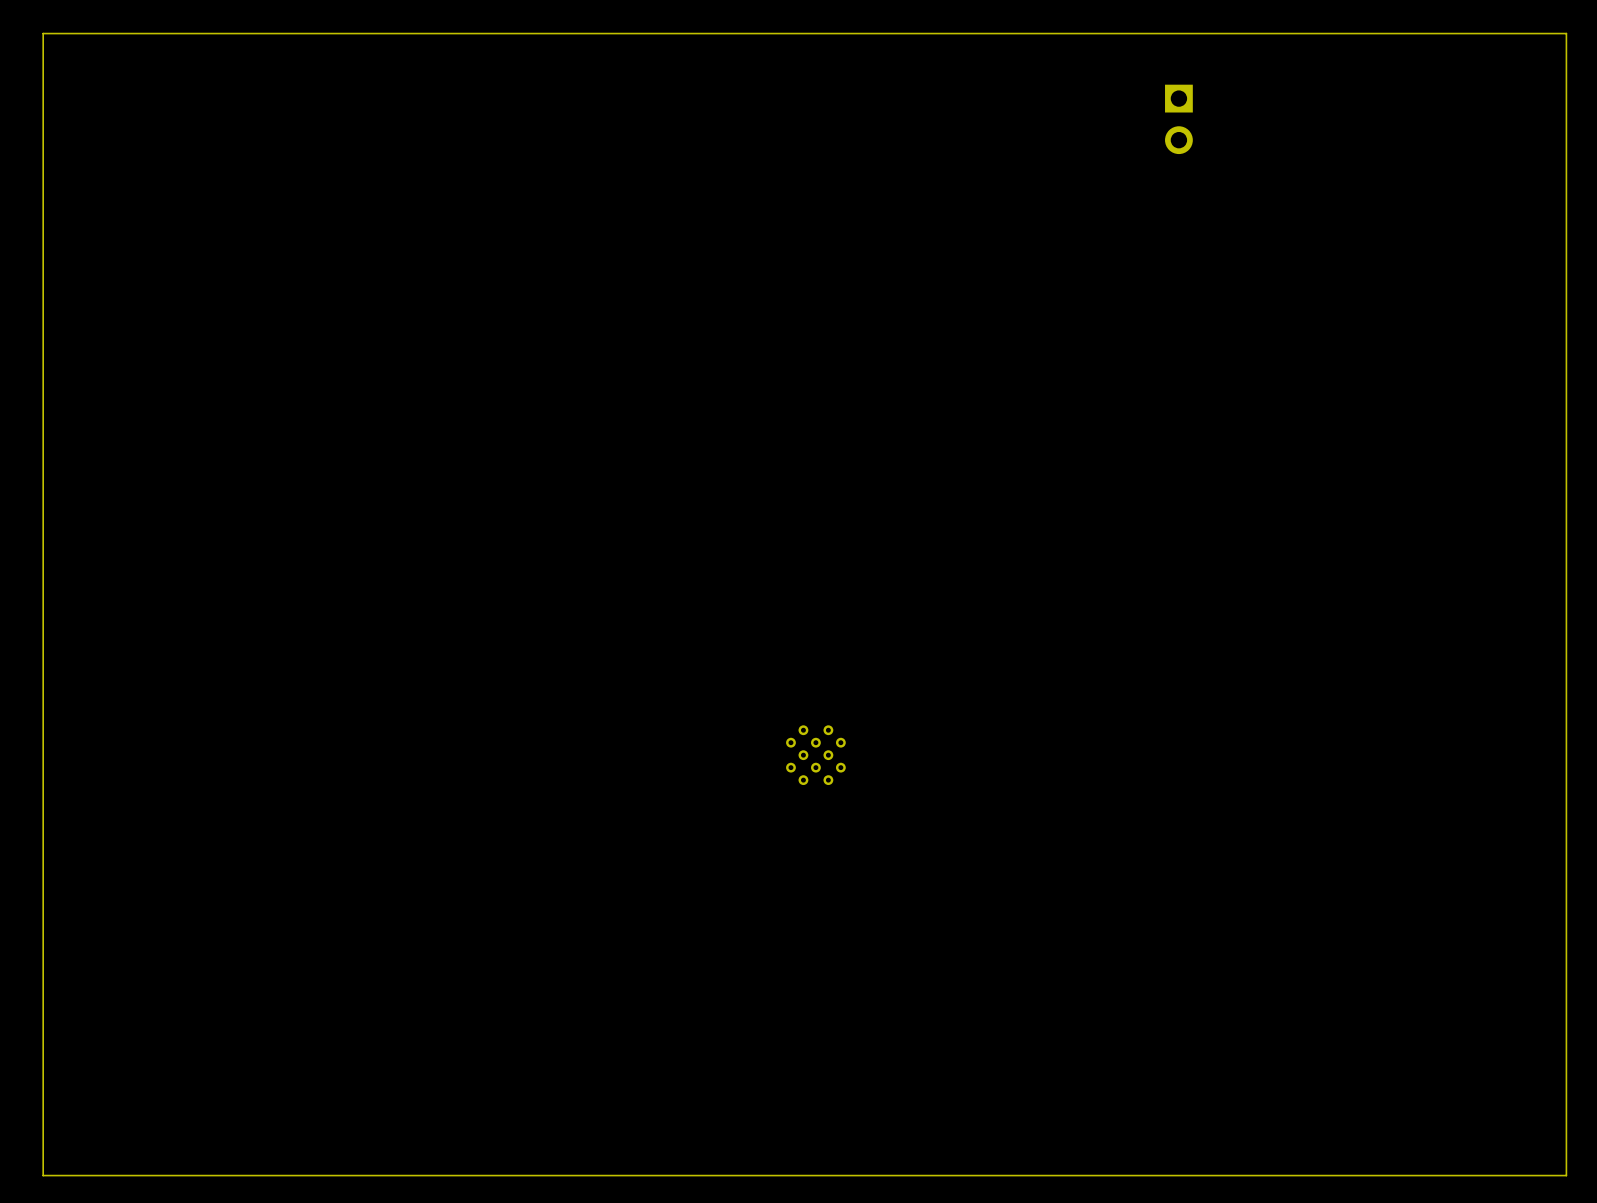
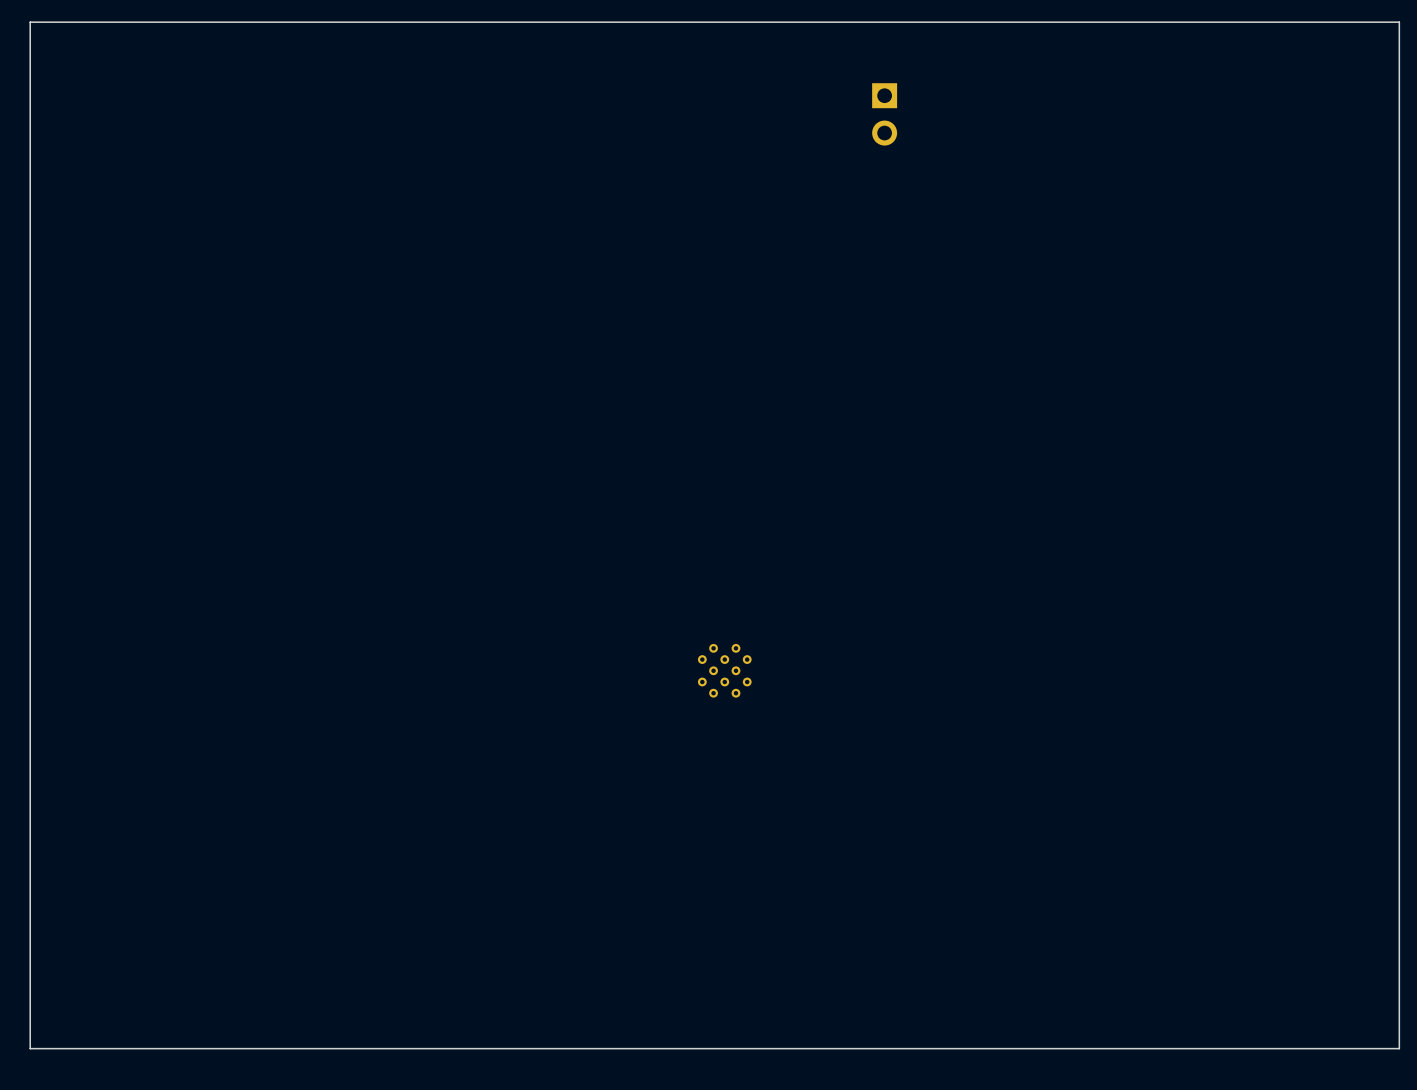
part position: (1178, 119) -> (884, 114)

